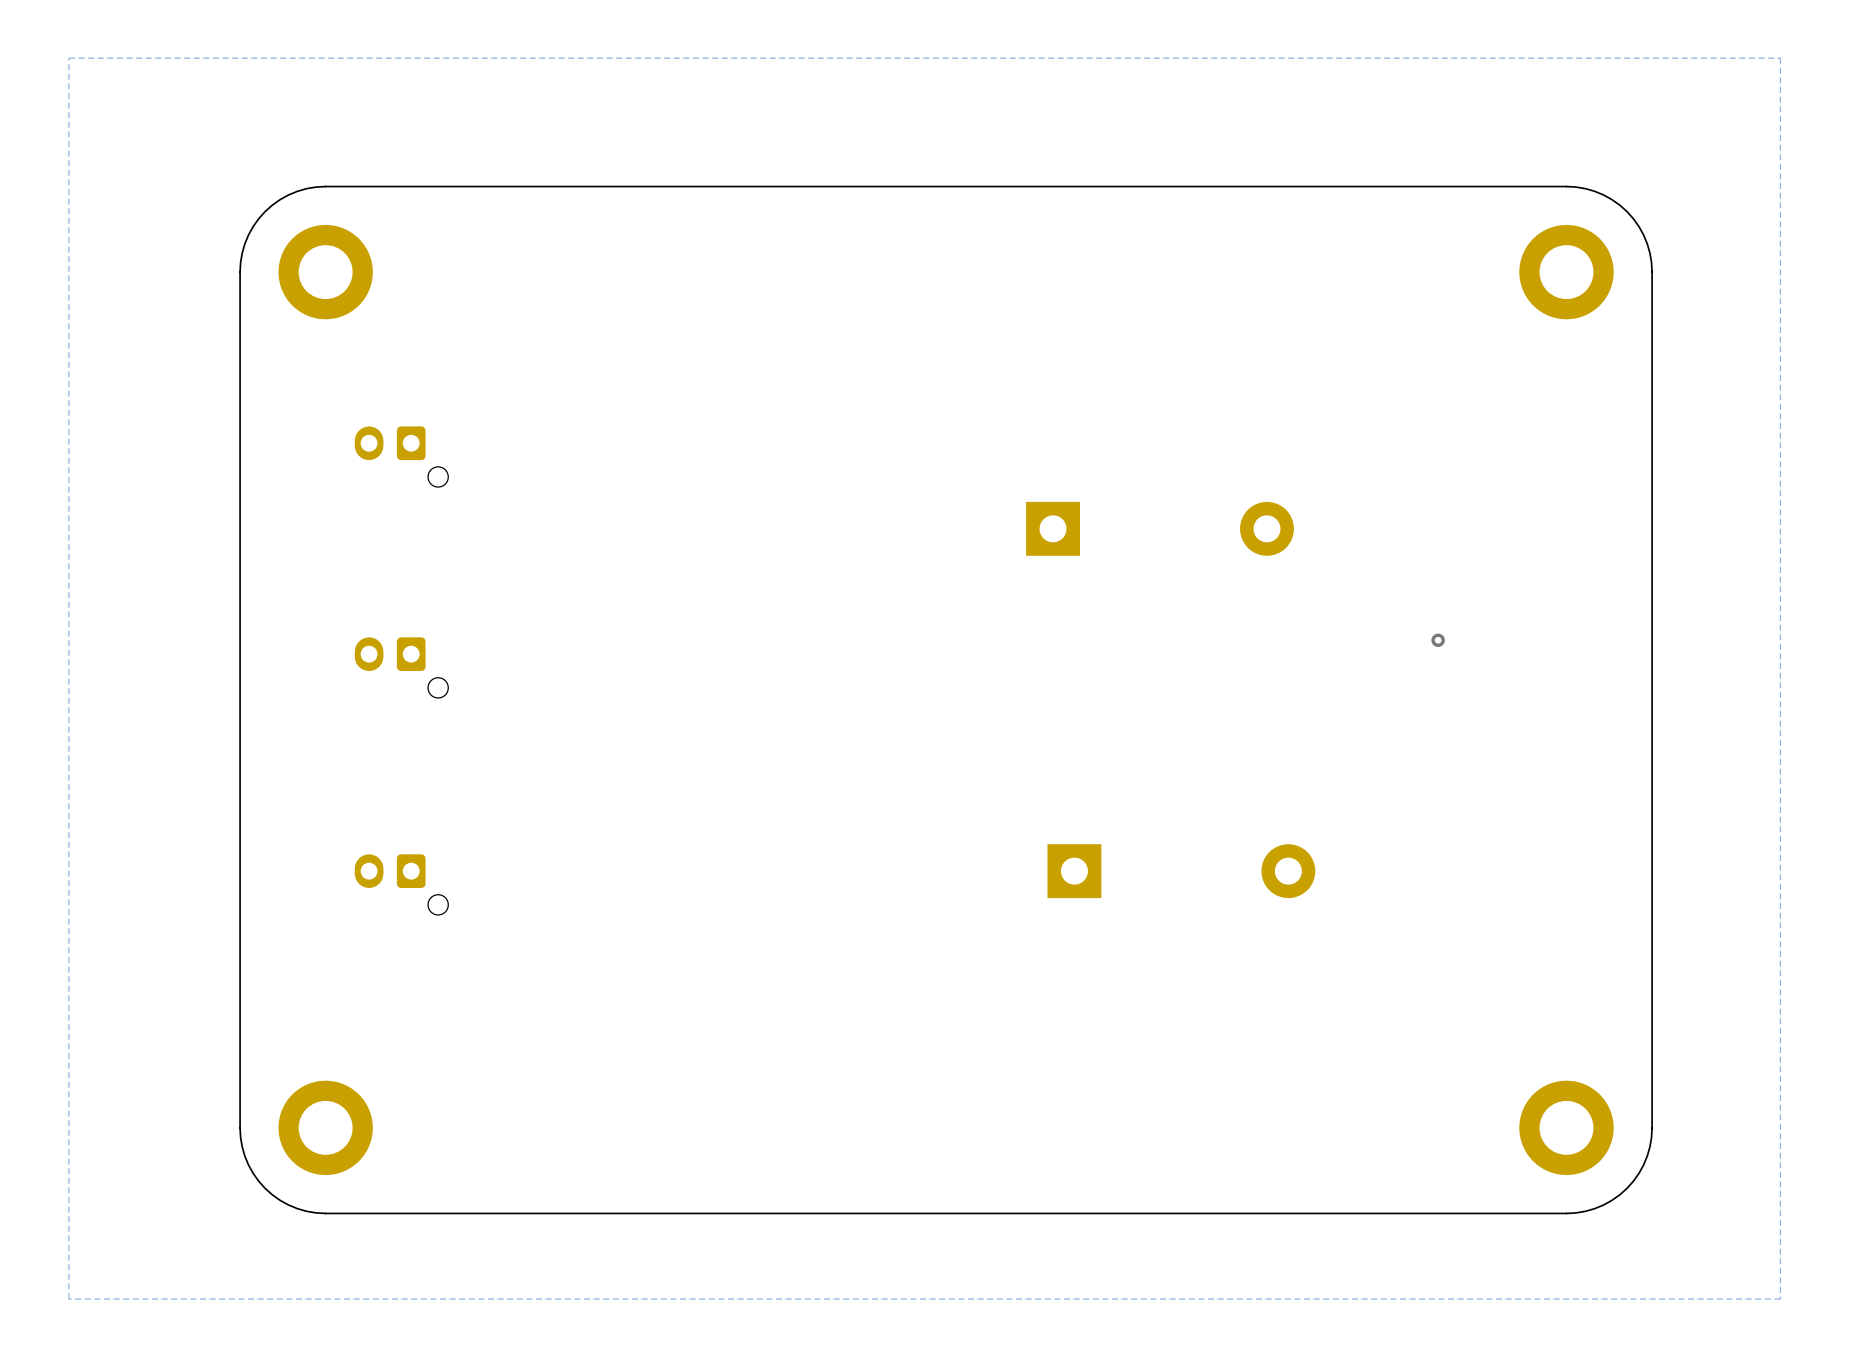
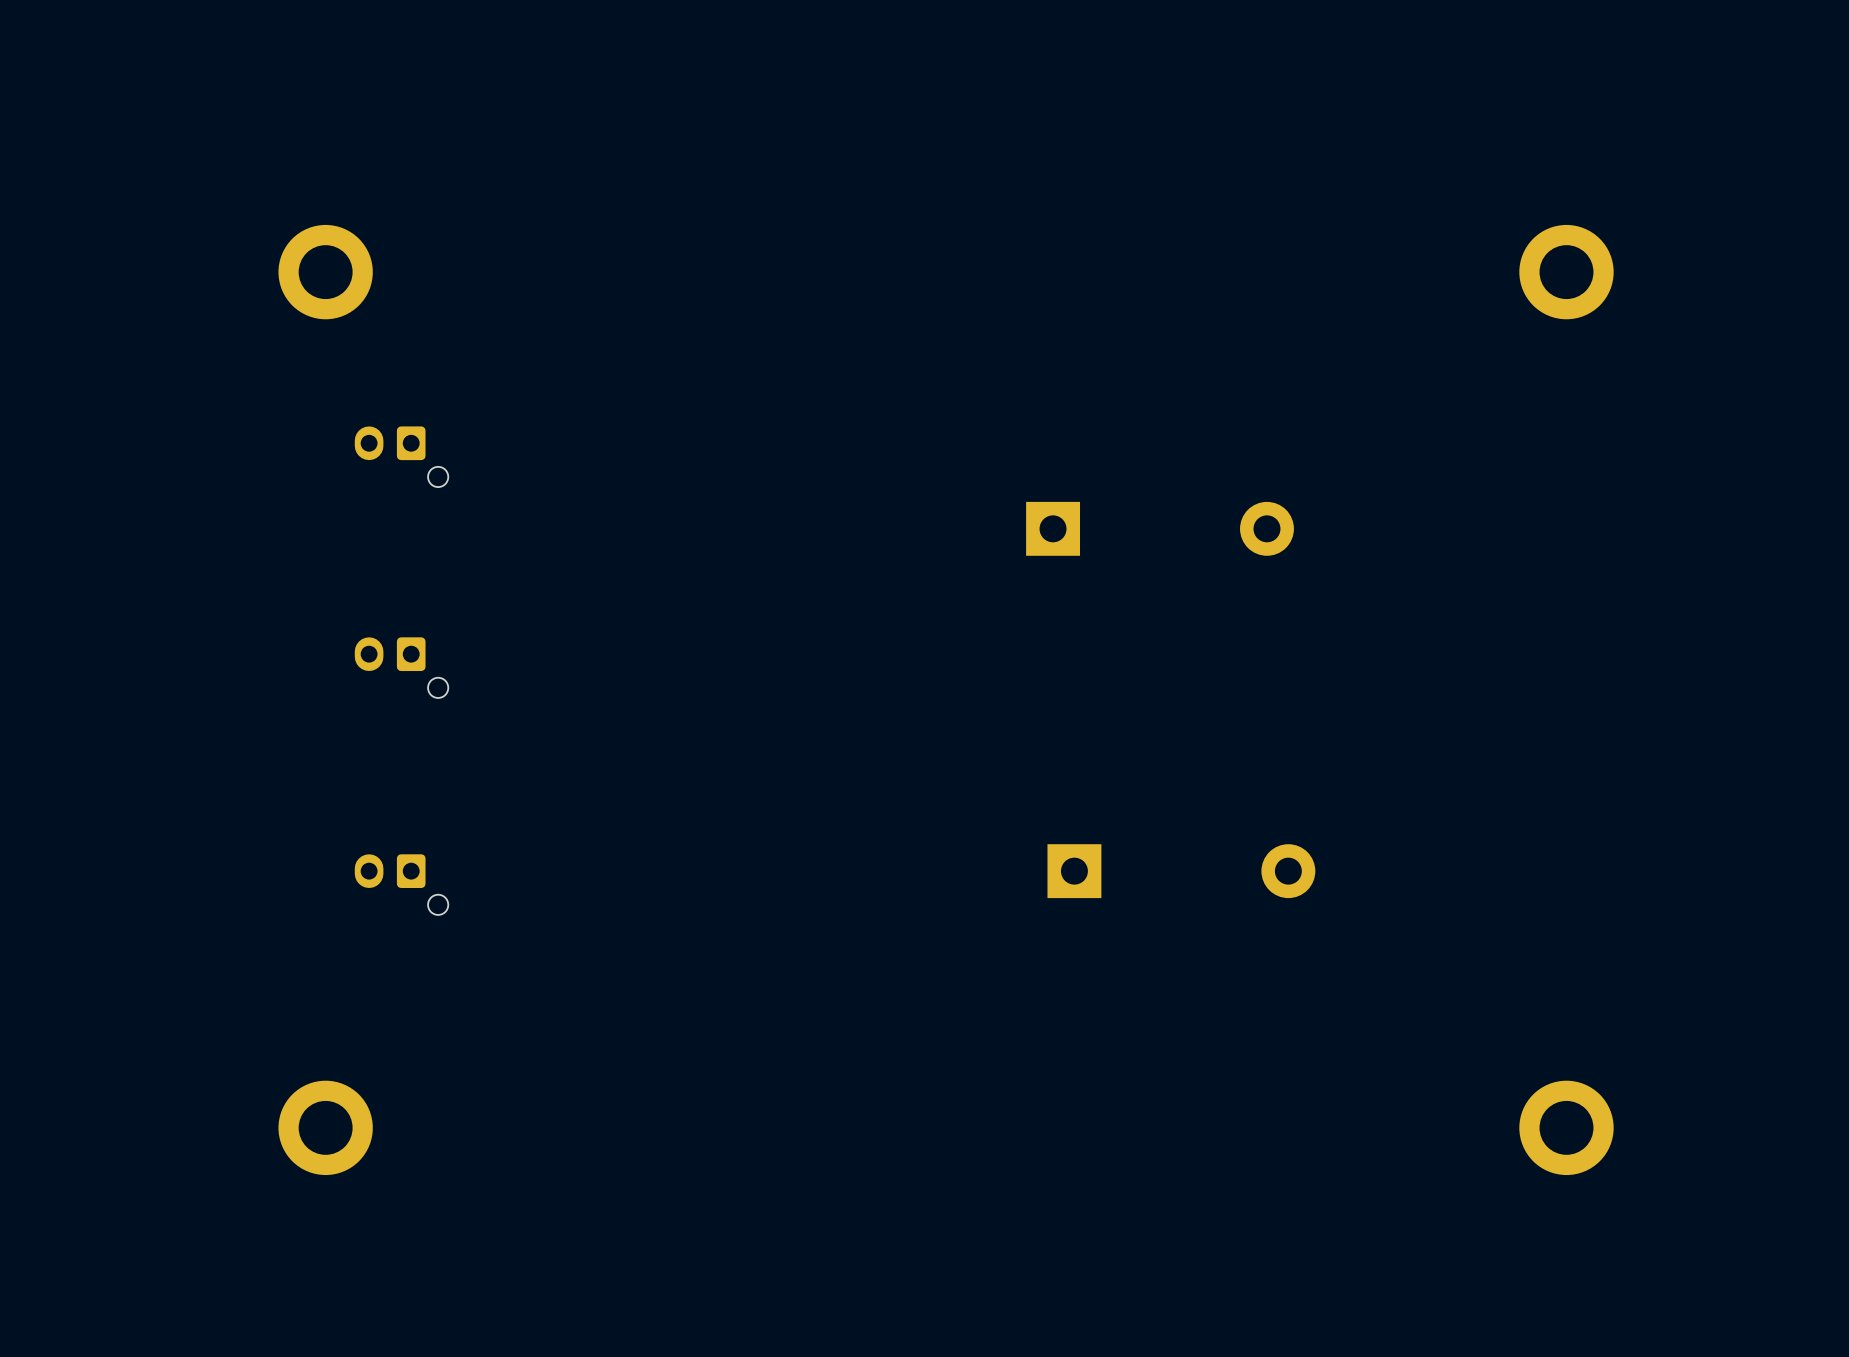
zone outline: (1780, 58) (1780, 1299) (68, 1299) (68, 58) (1780, 58) -> none
board edge: (1566, 186) (325, 186) (297, 191) (272, 205) (258, 218) (248, 234) (242, 253) (240, 272) (240, 1127) (244, 1156) (258, 1181) (272, 1194) (288, 1204) (306, 1211) (325, 1213) (1566, 1213) (1594, 1208) (1619, 1194) (1633, 1181) (1643, 1165) (1649, 1146) (1652, 1127) (1652, 272) (1647, 243) (1638, 226) (1627, 211) (1612, 199) (1594, 191) (1566, 186) -> none
via: (1438, 640) -> none

